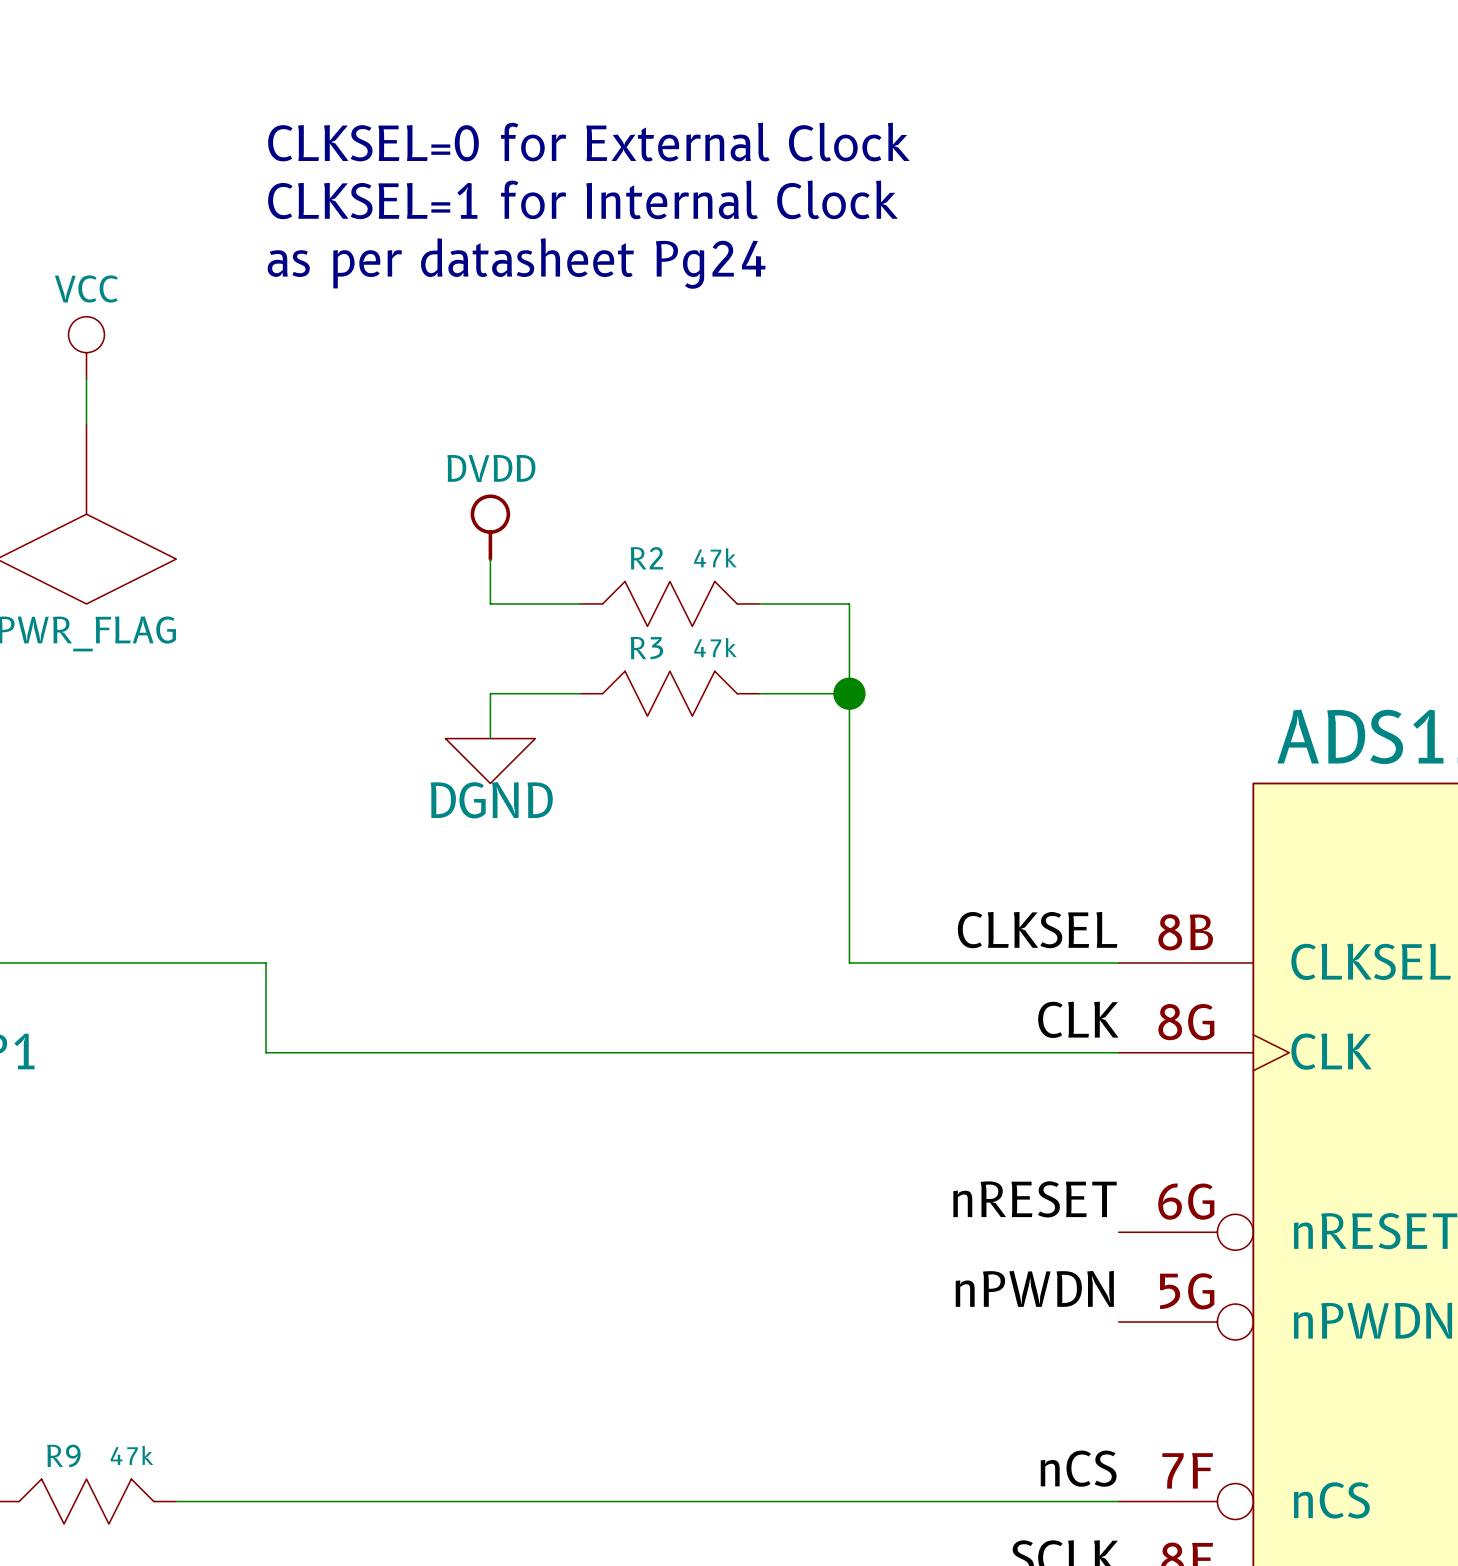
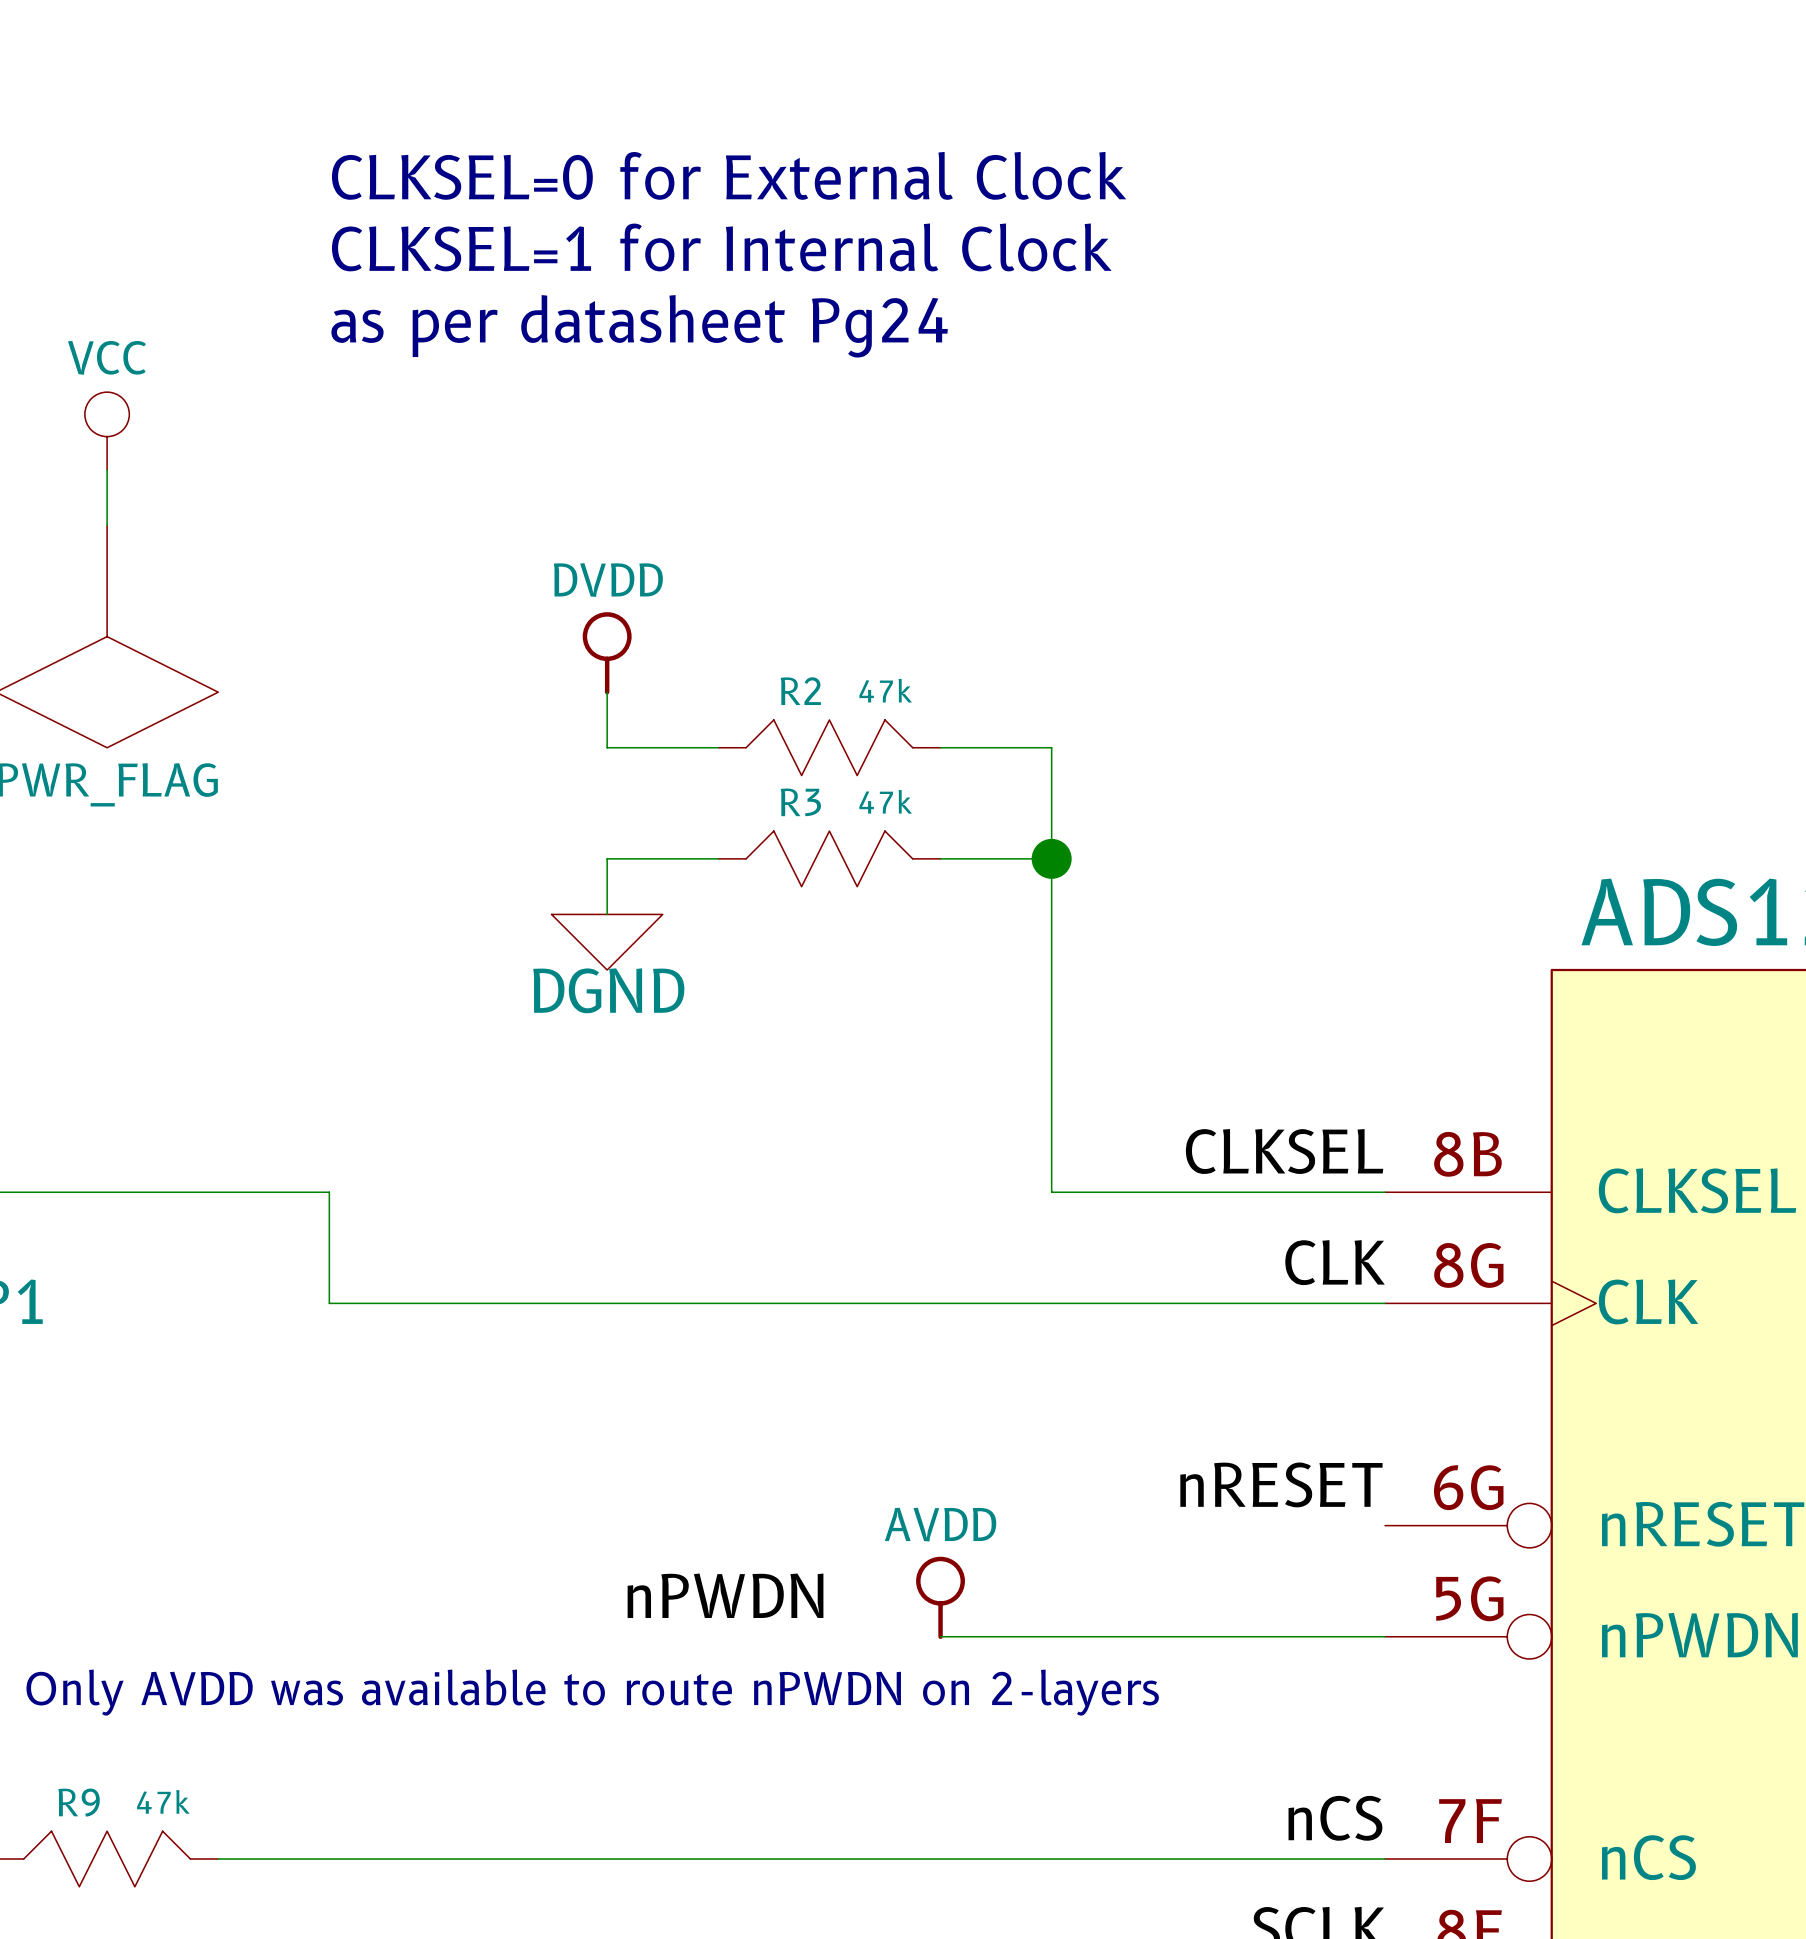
label position: nPWDN (1034, 1288) -> nPWDN (725, 1595)
power symbol: none -> AVDD (940, 1597)
wire: none -> (940, 1636) (1385, 1636)
text: none -> Only AVDD was available to route nPWDN on 2-layers (592, 1692)

